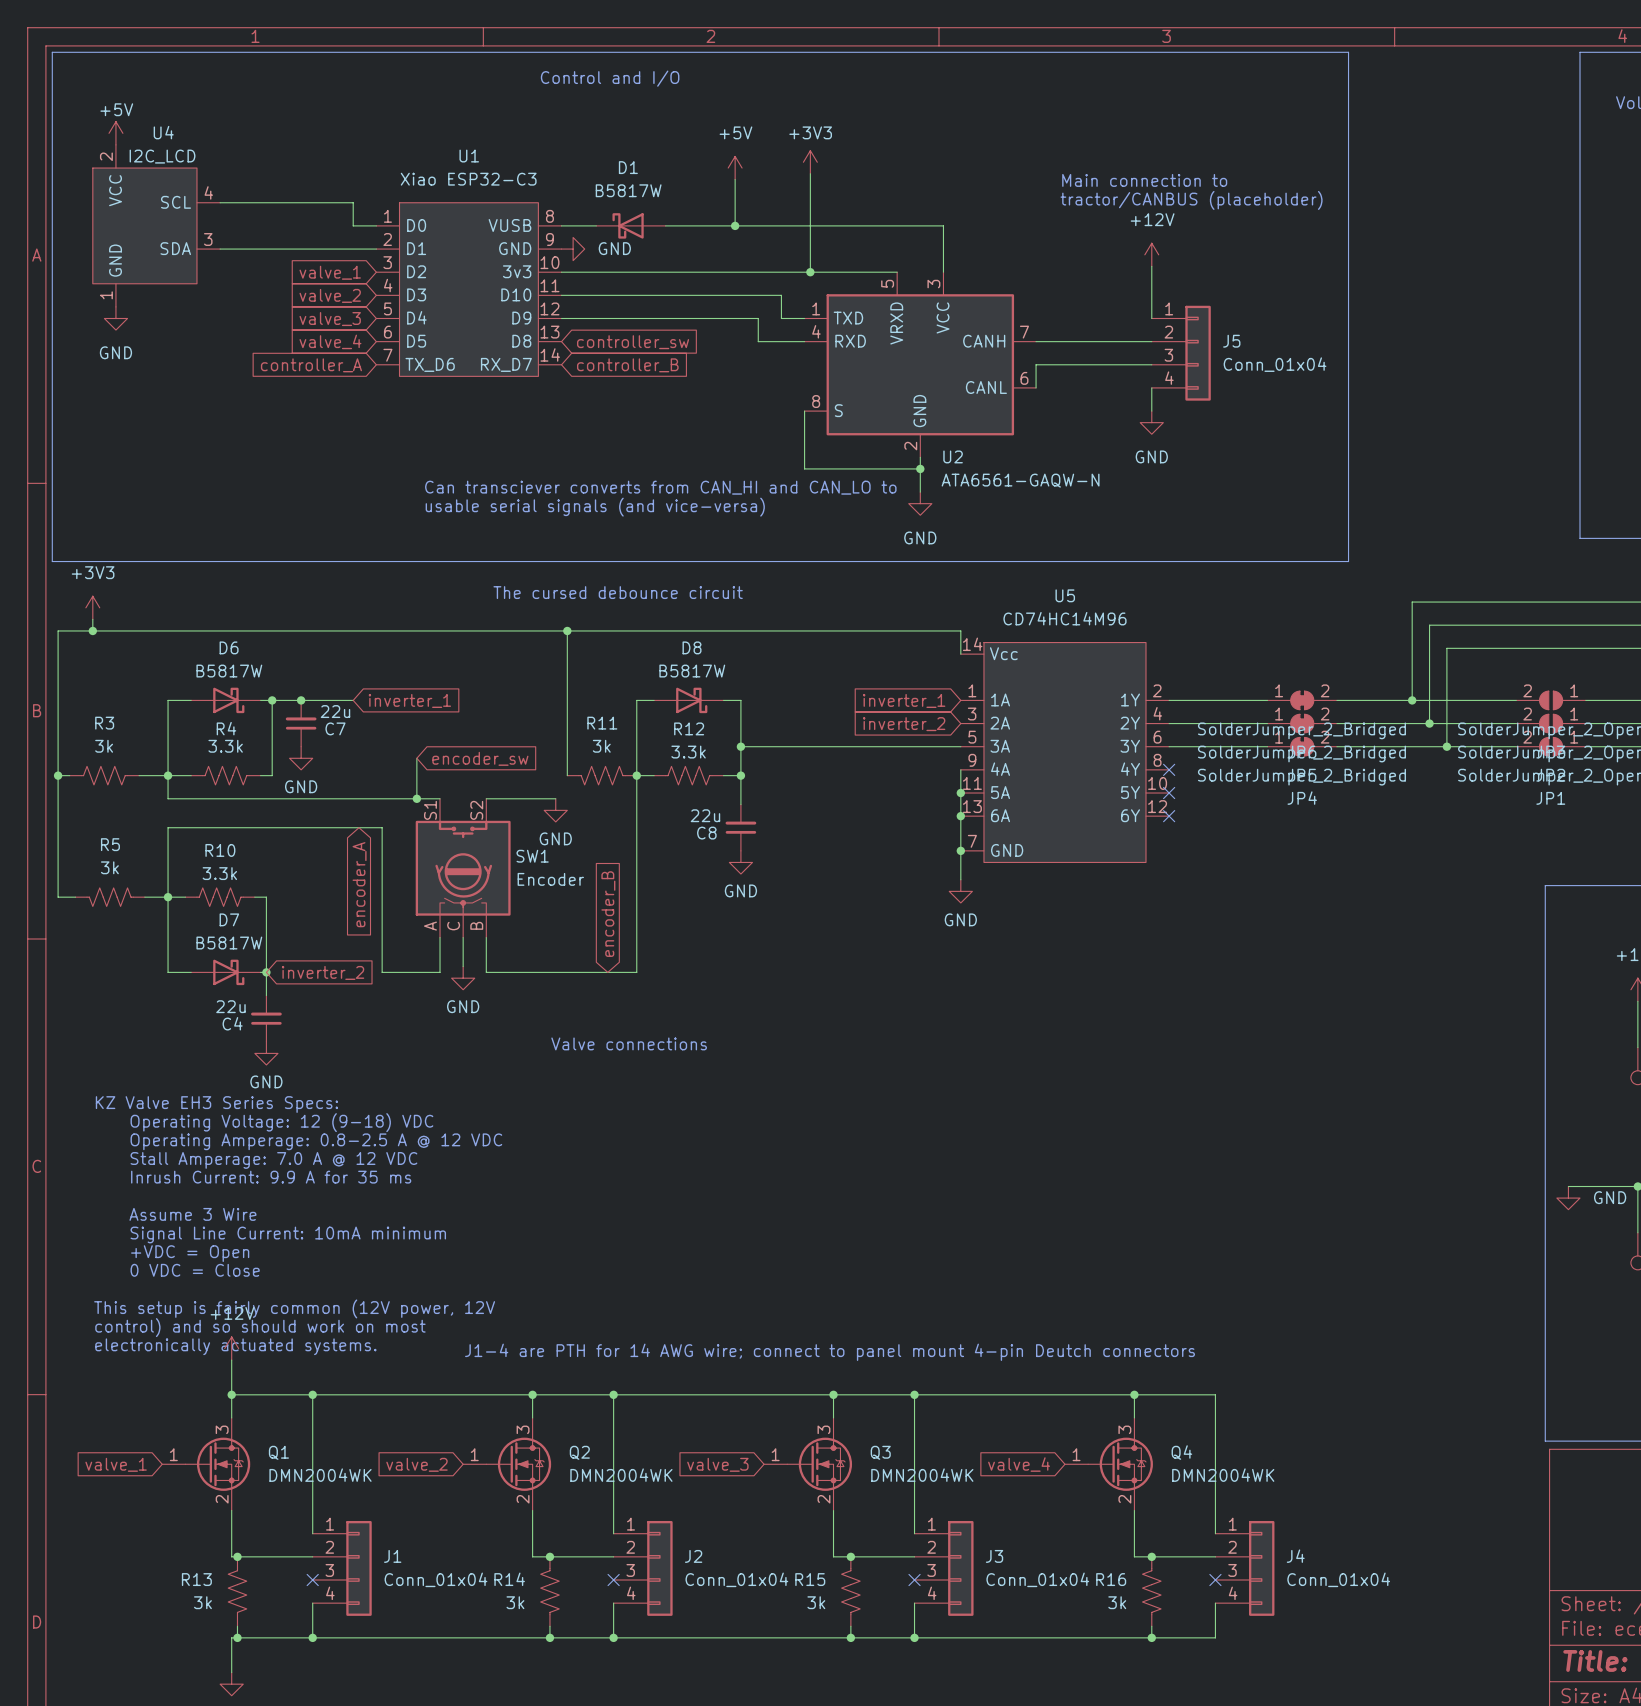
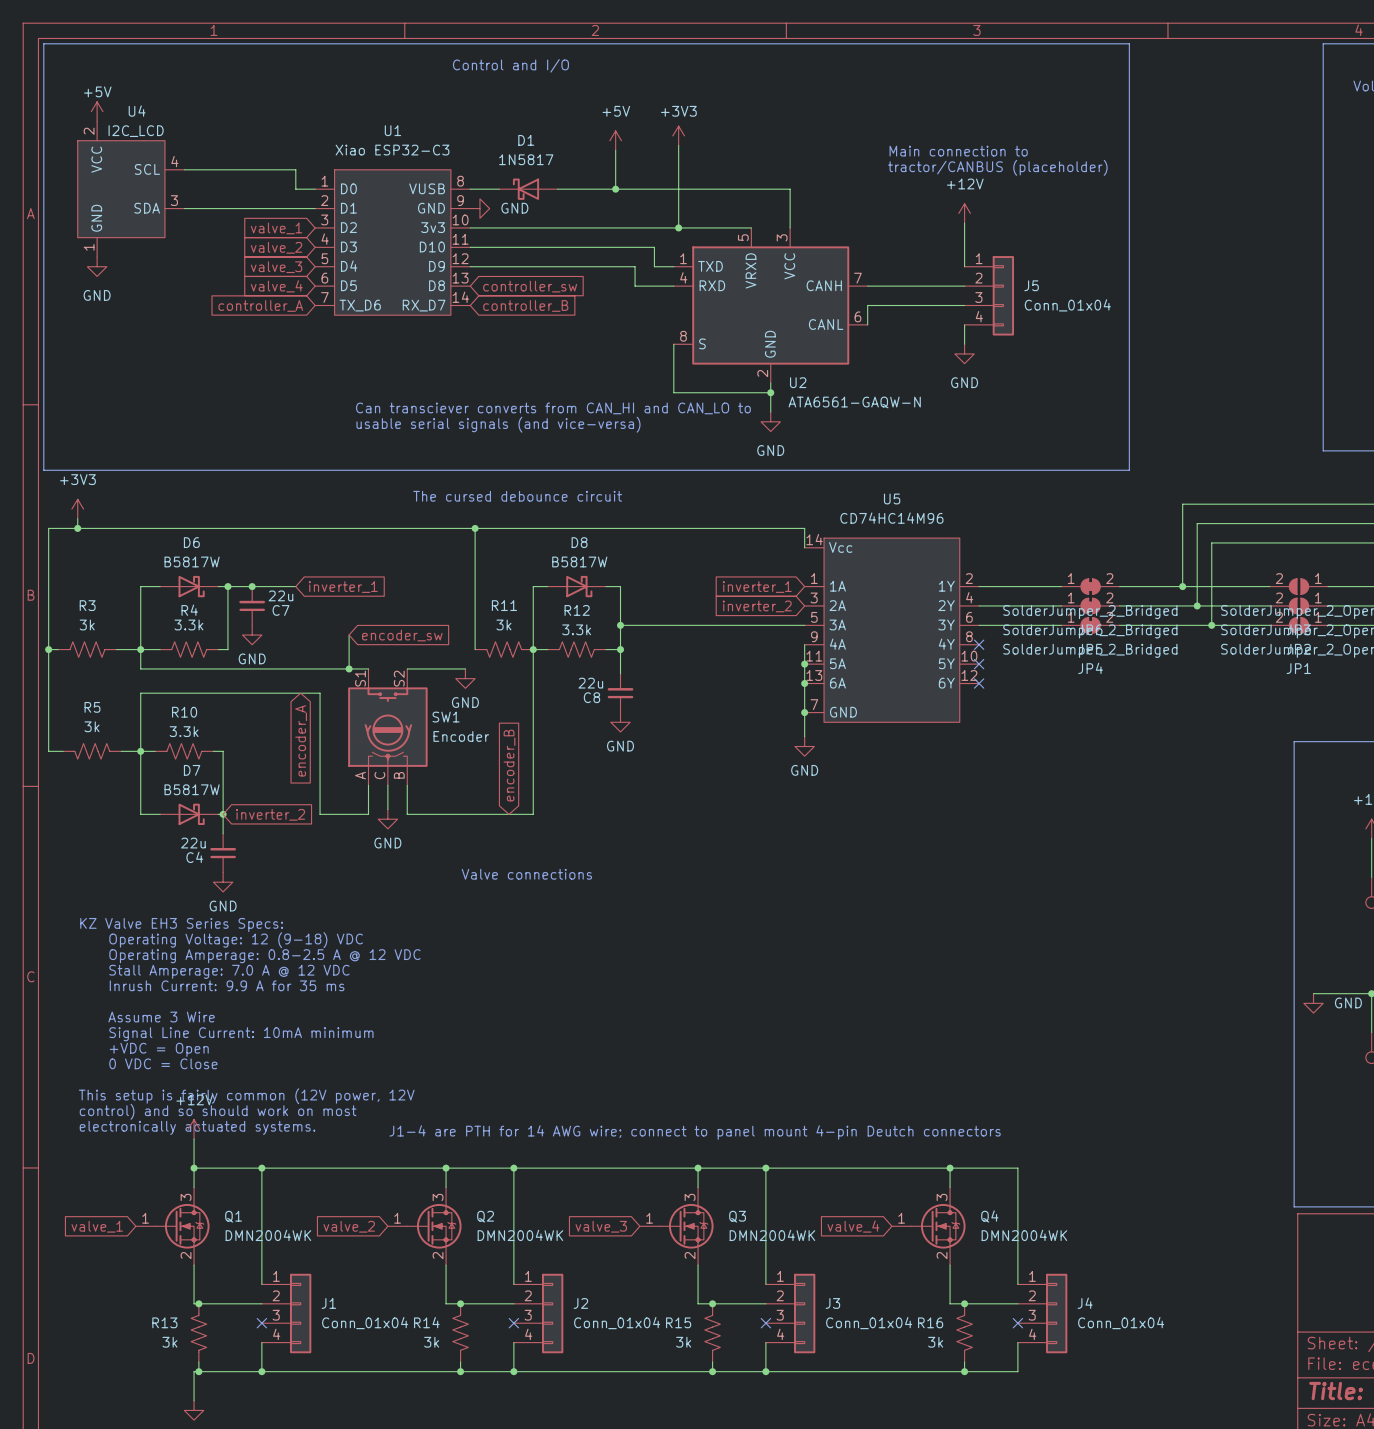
D1 value: B5817W (628, 190) -> 1N5817 (526, 159)

